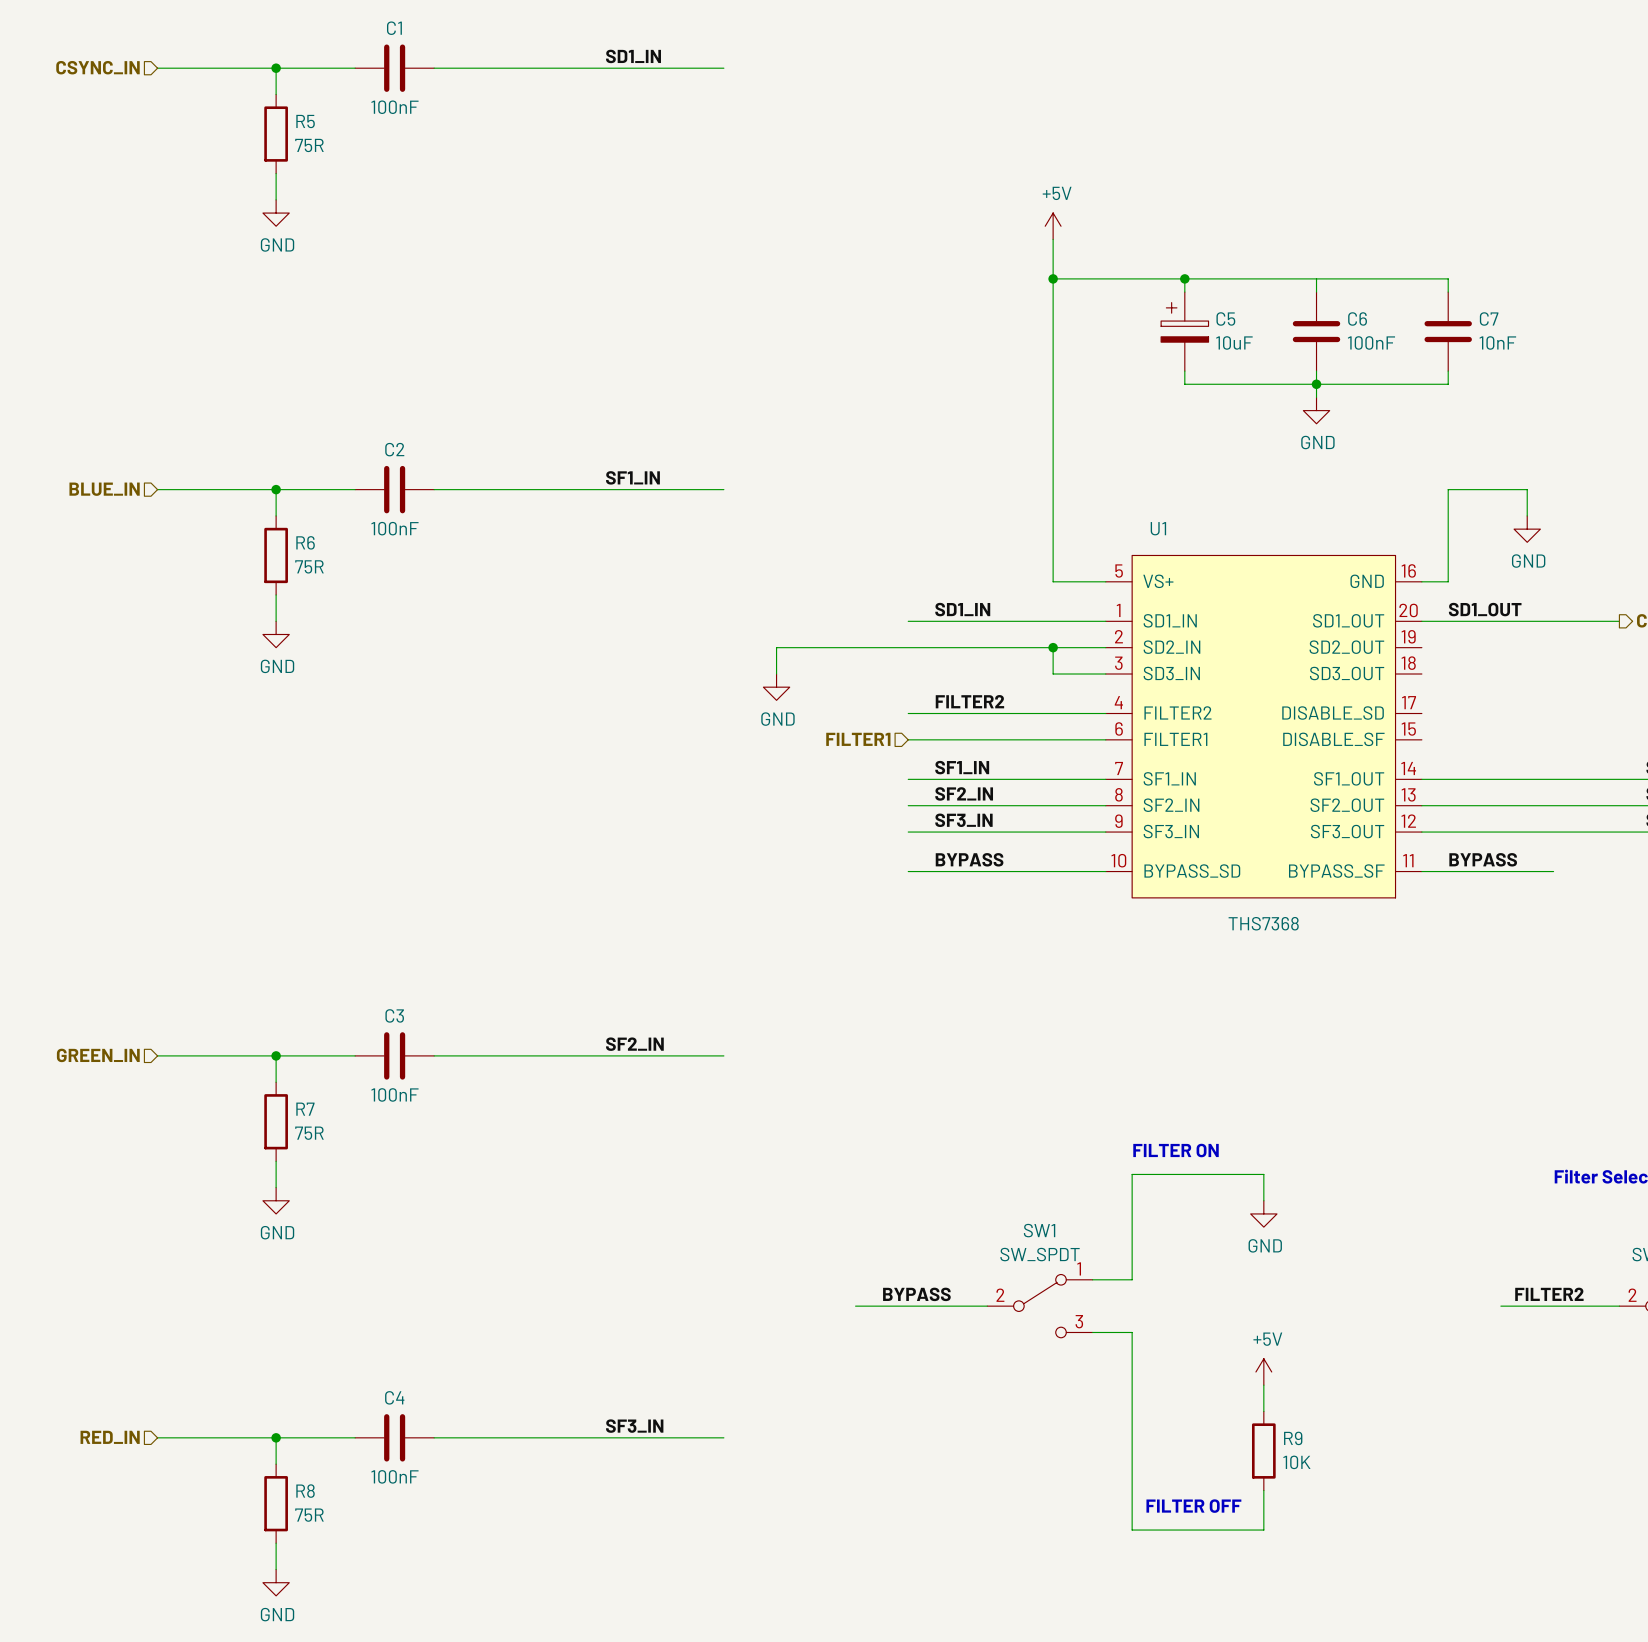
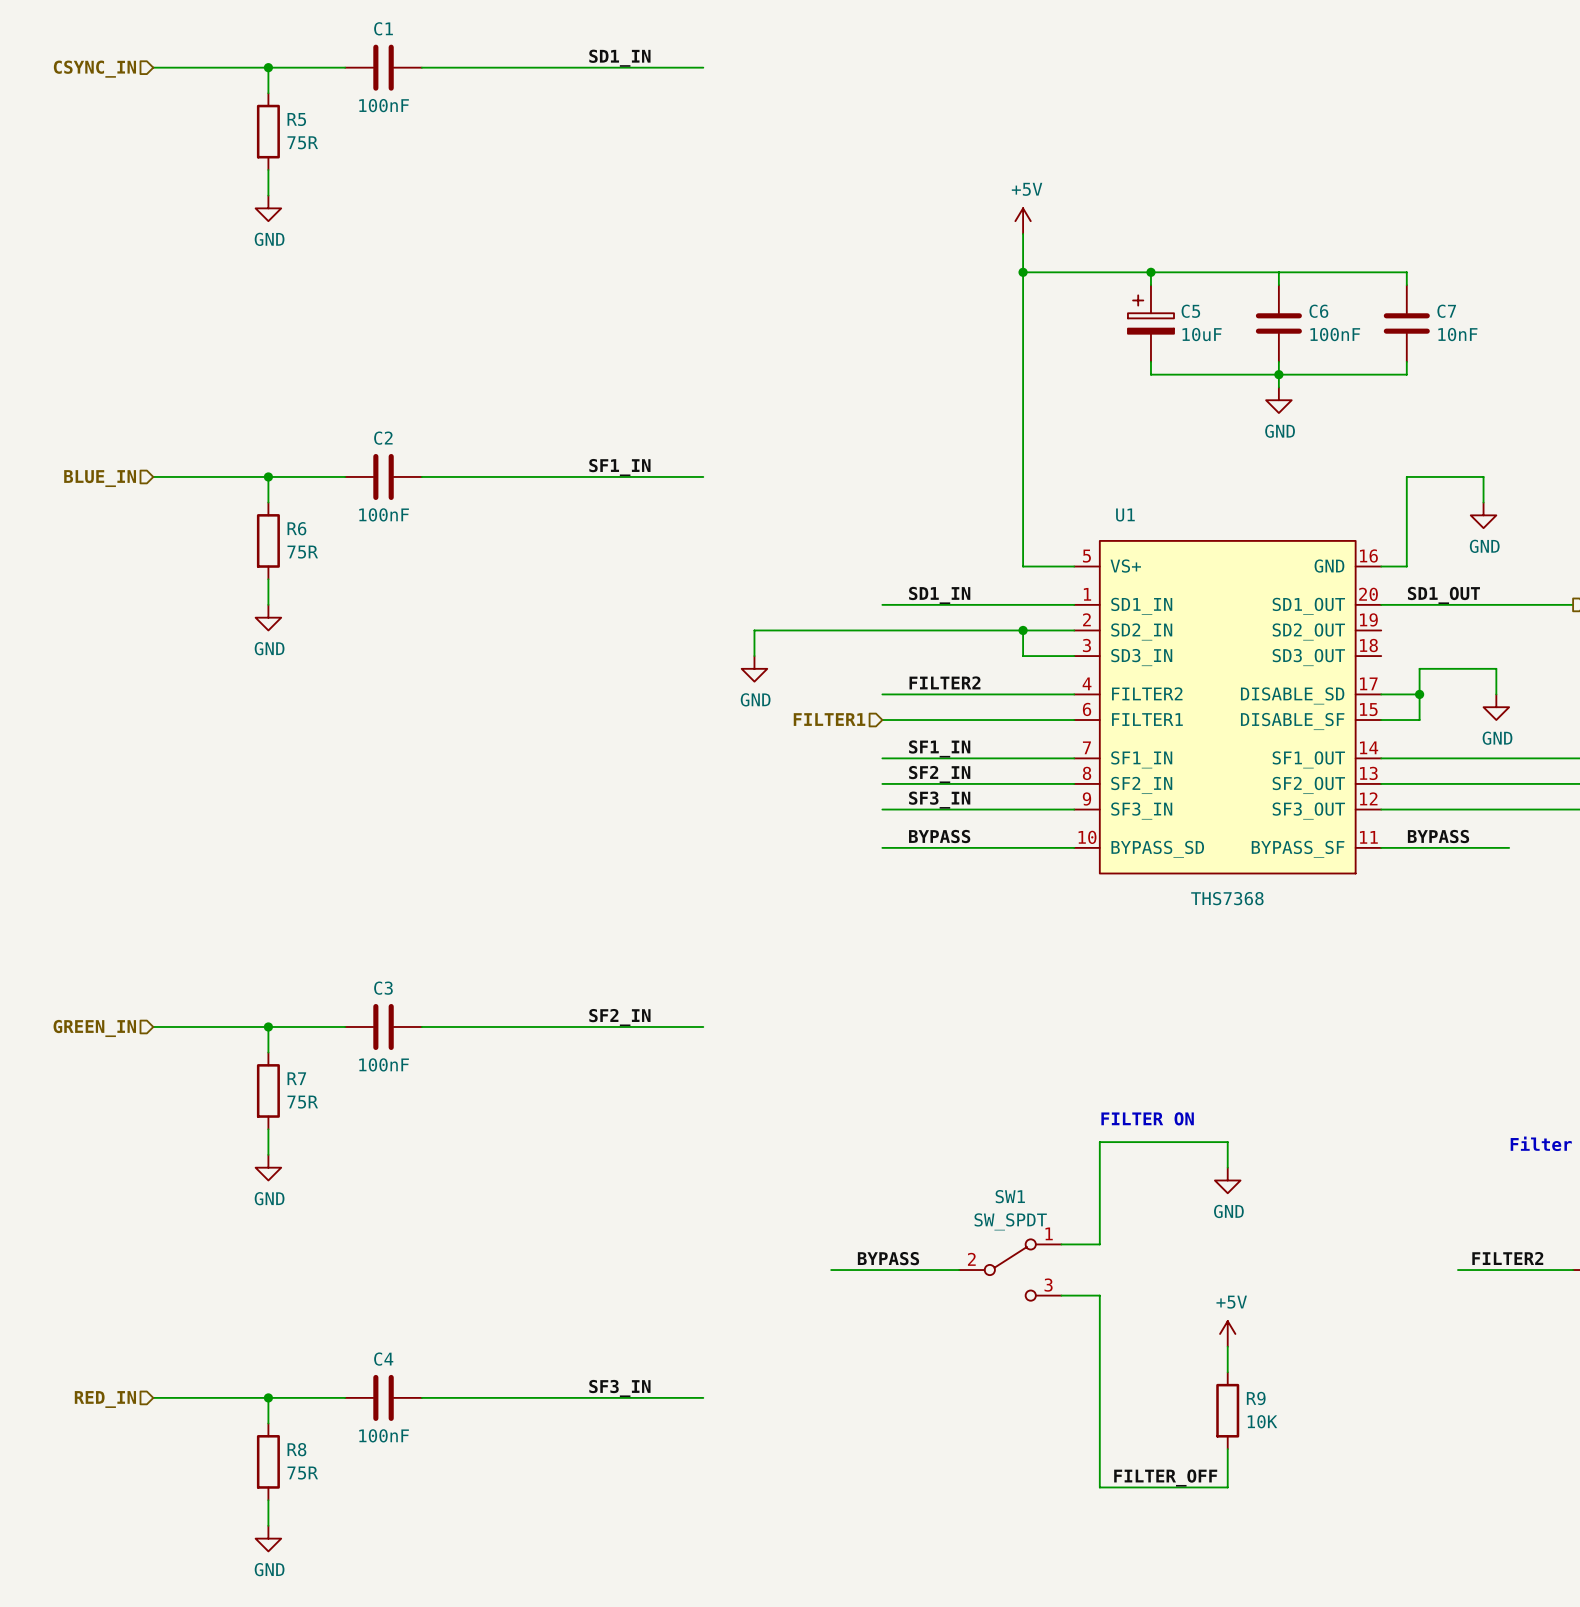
wire: none -> (1381, 694) (1419, 694)
junction: none -> (1419, 694)
wire: none -> (1496, 694) (1496, 668) (1419, 668) (1419, 720) (1381, 720)
power symbol: none -> GND (1496, 707)
text: FILTER OFF (1193, 1506) -> none
label: none -> FILTER_OFF (1165, 1478)

